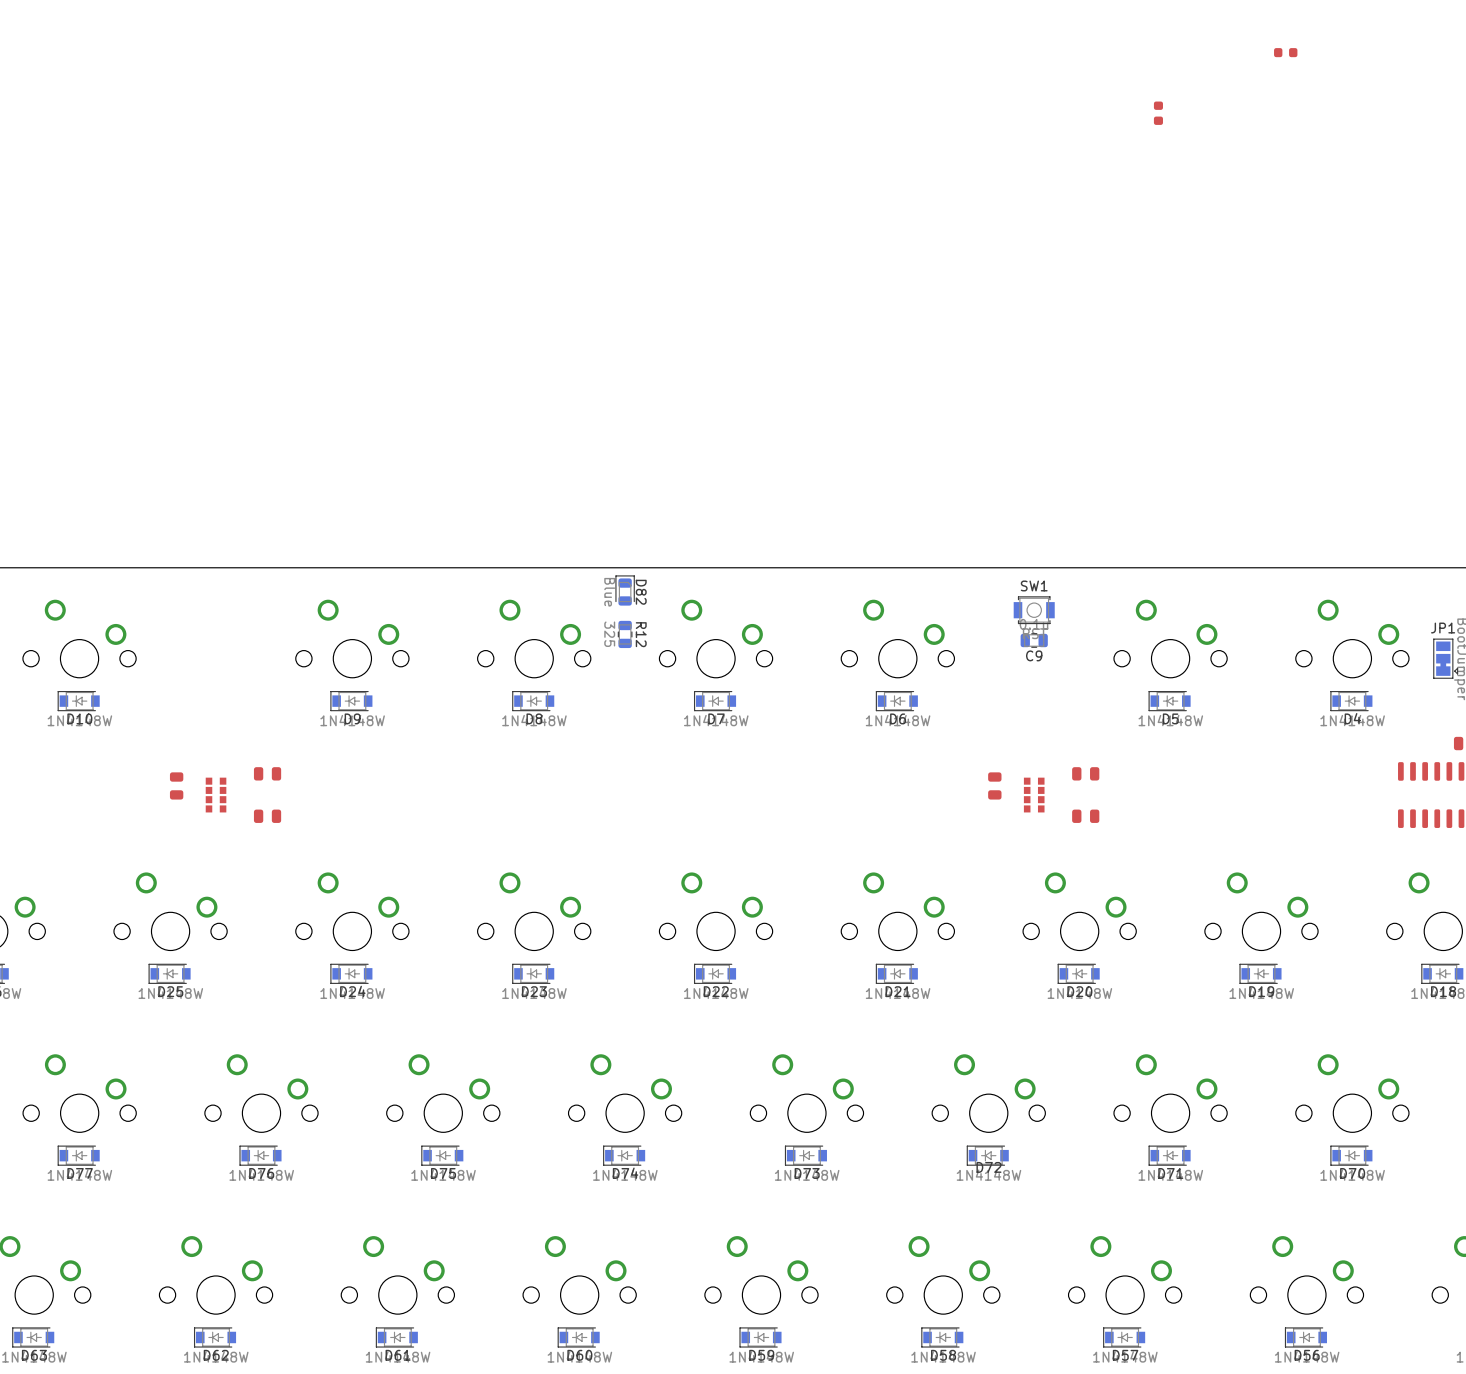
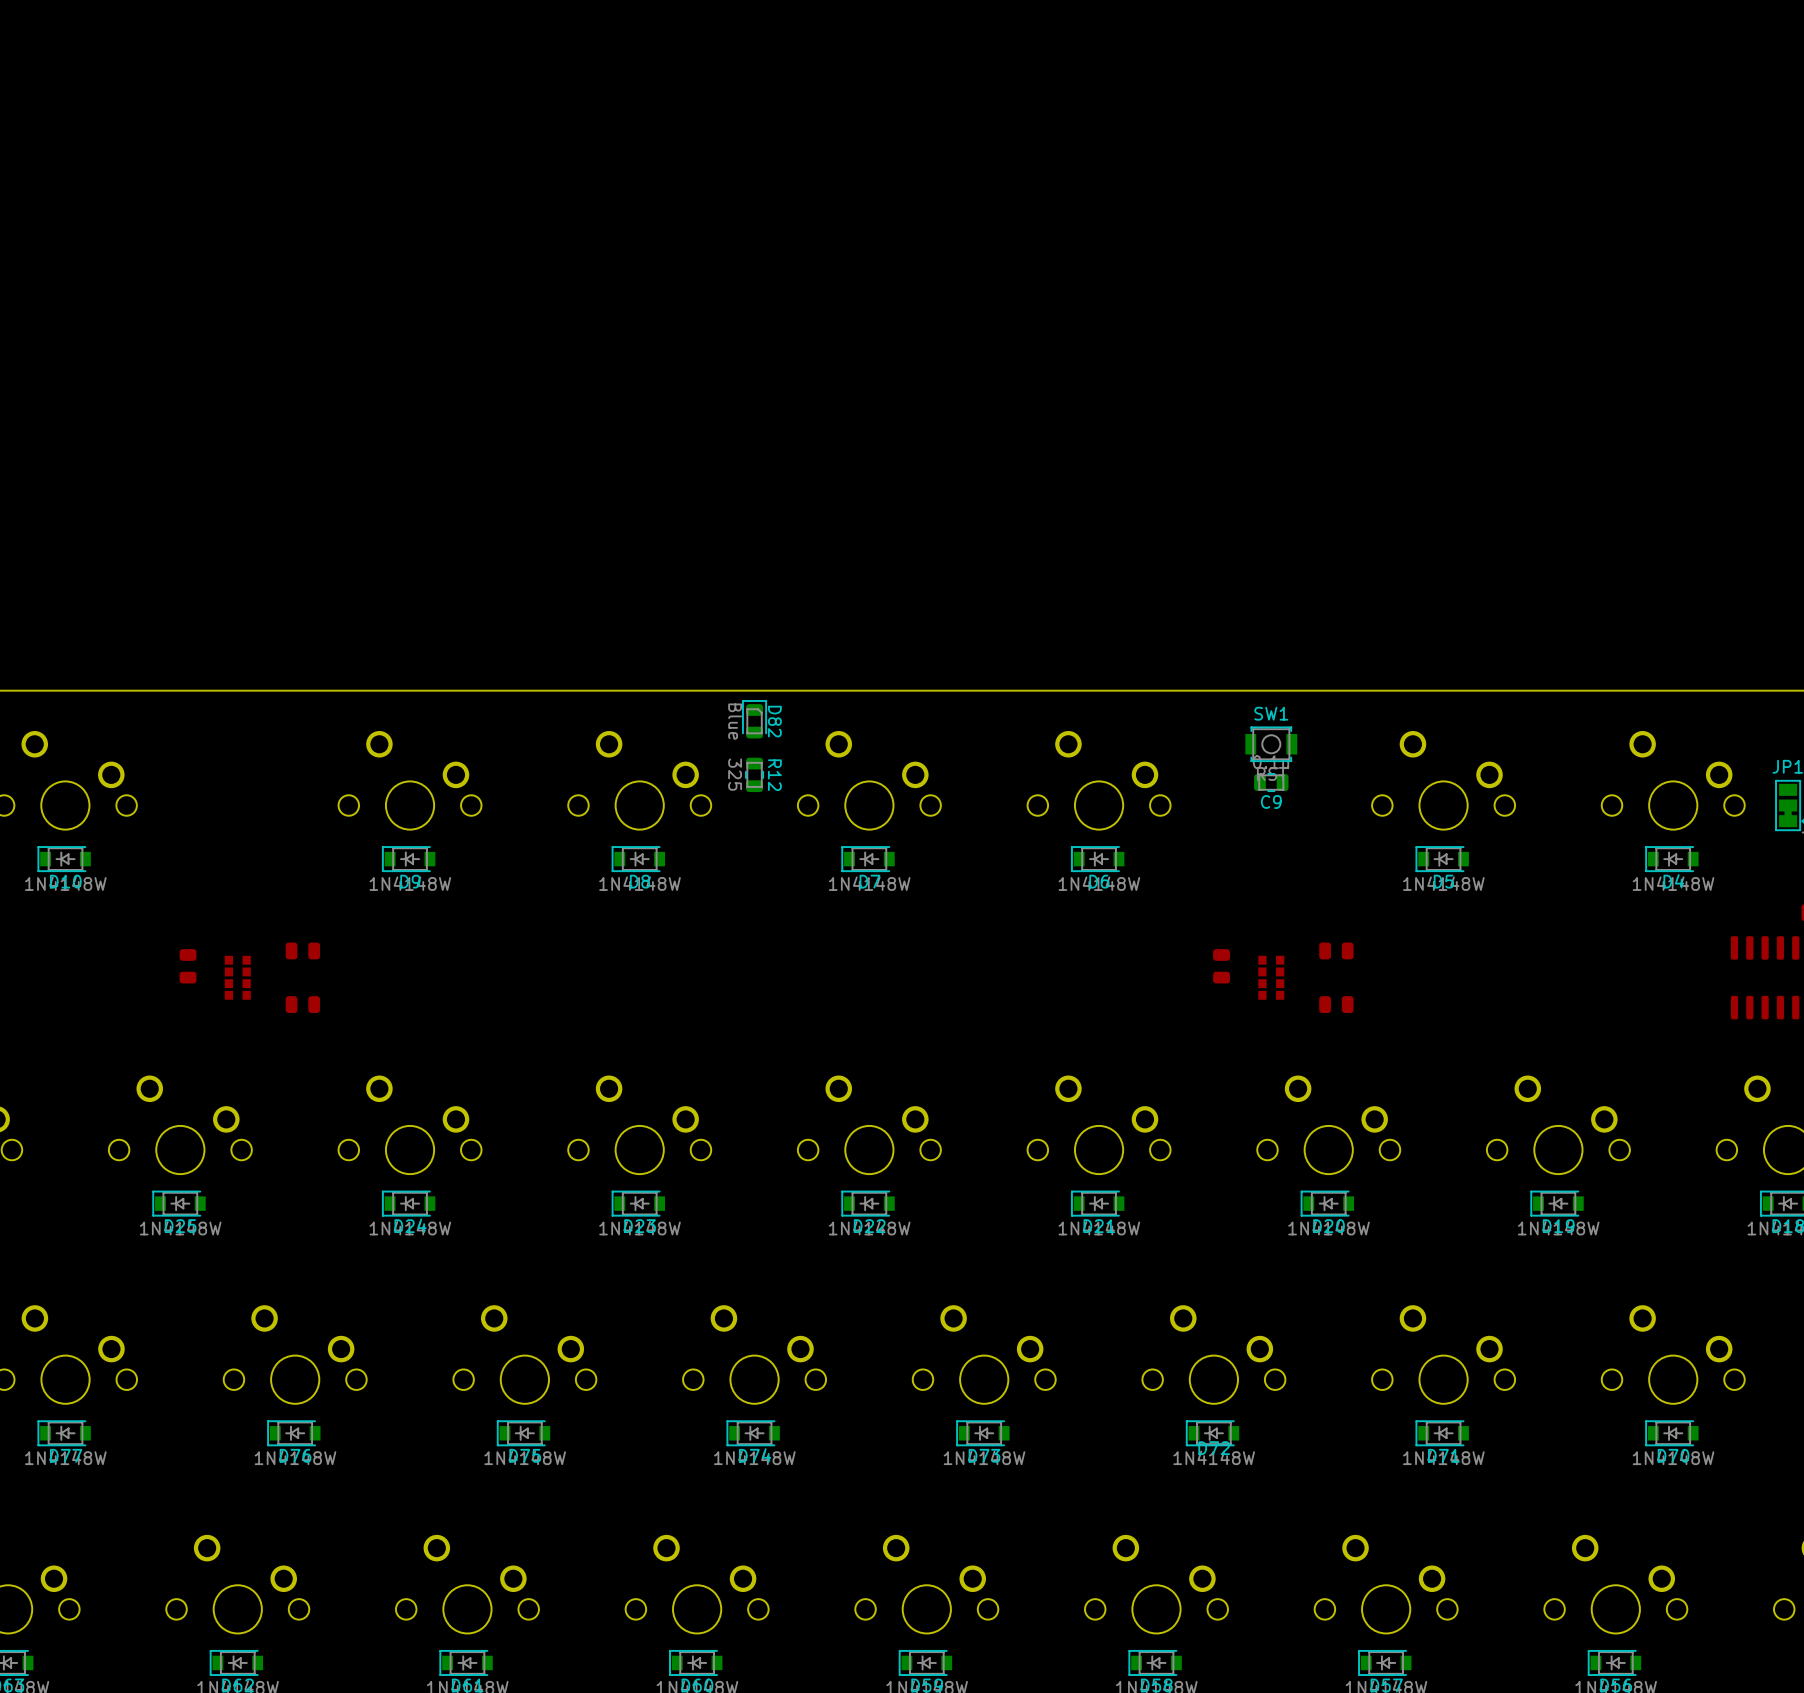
part: (1285, 52) -> none
part: (1158, 113) -> none

